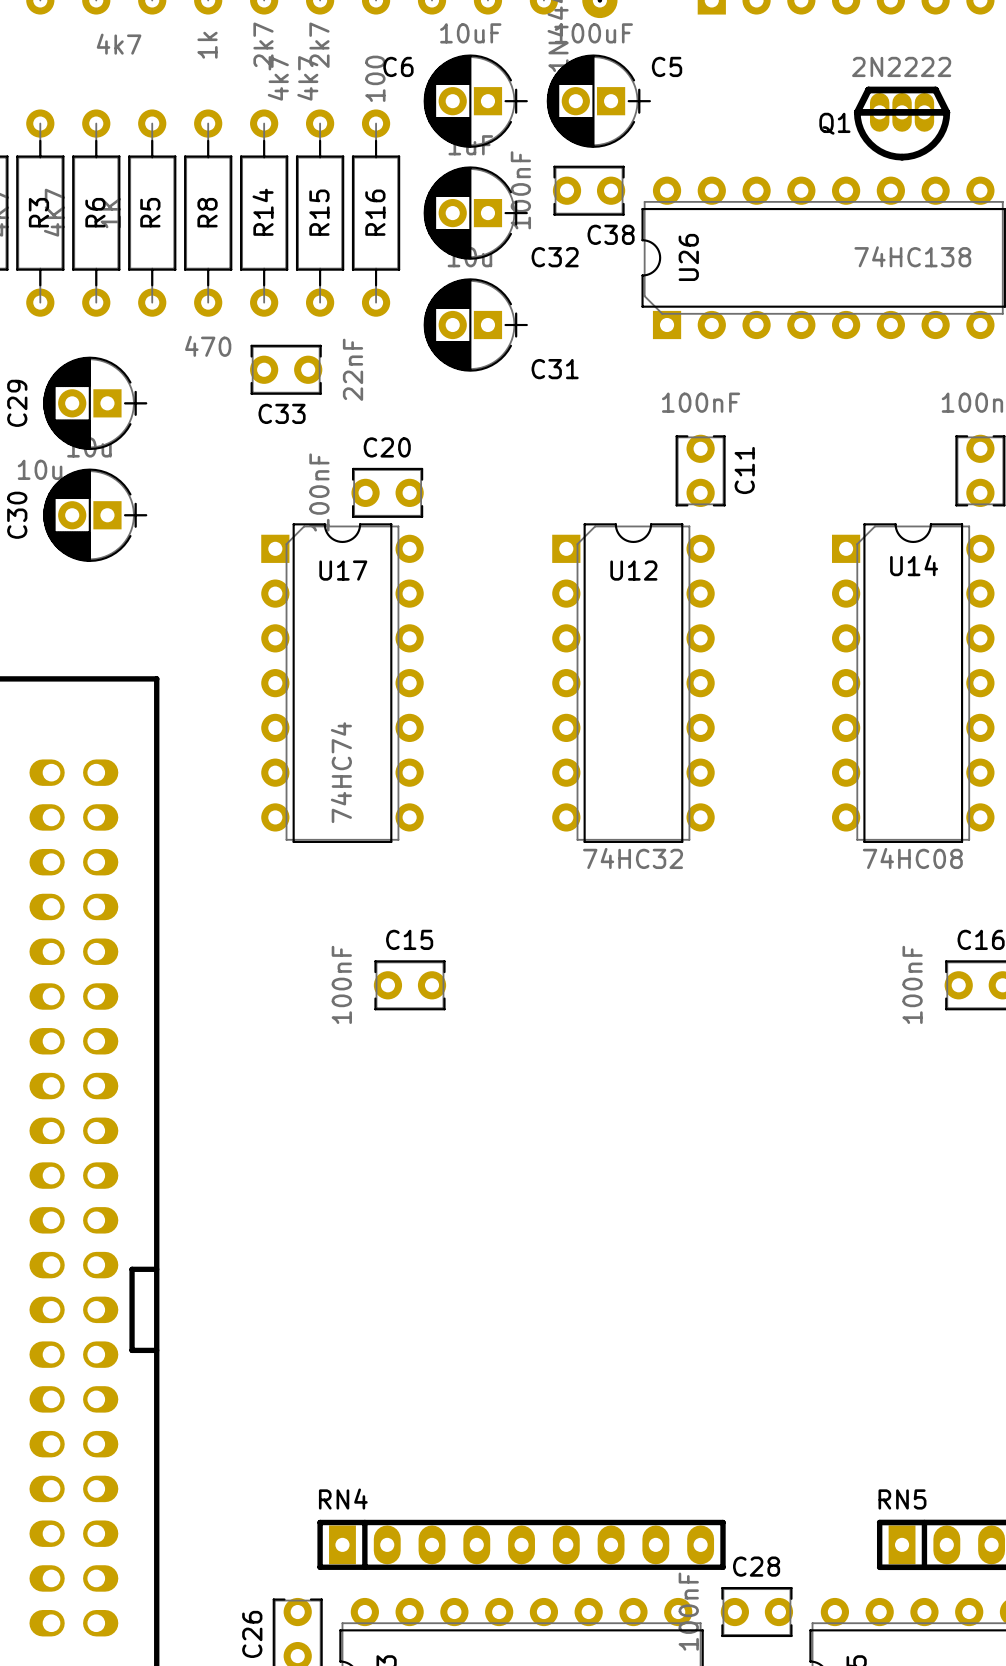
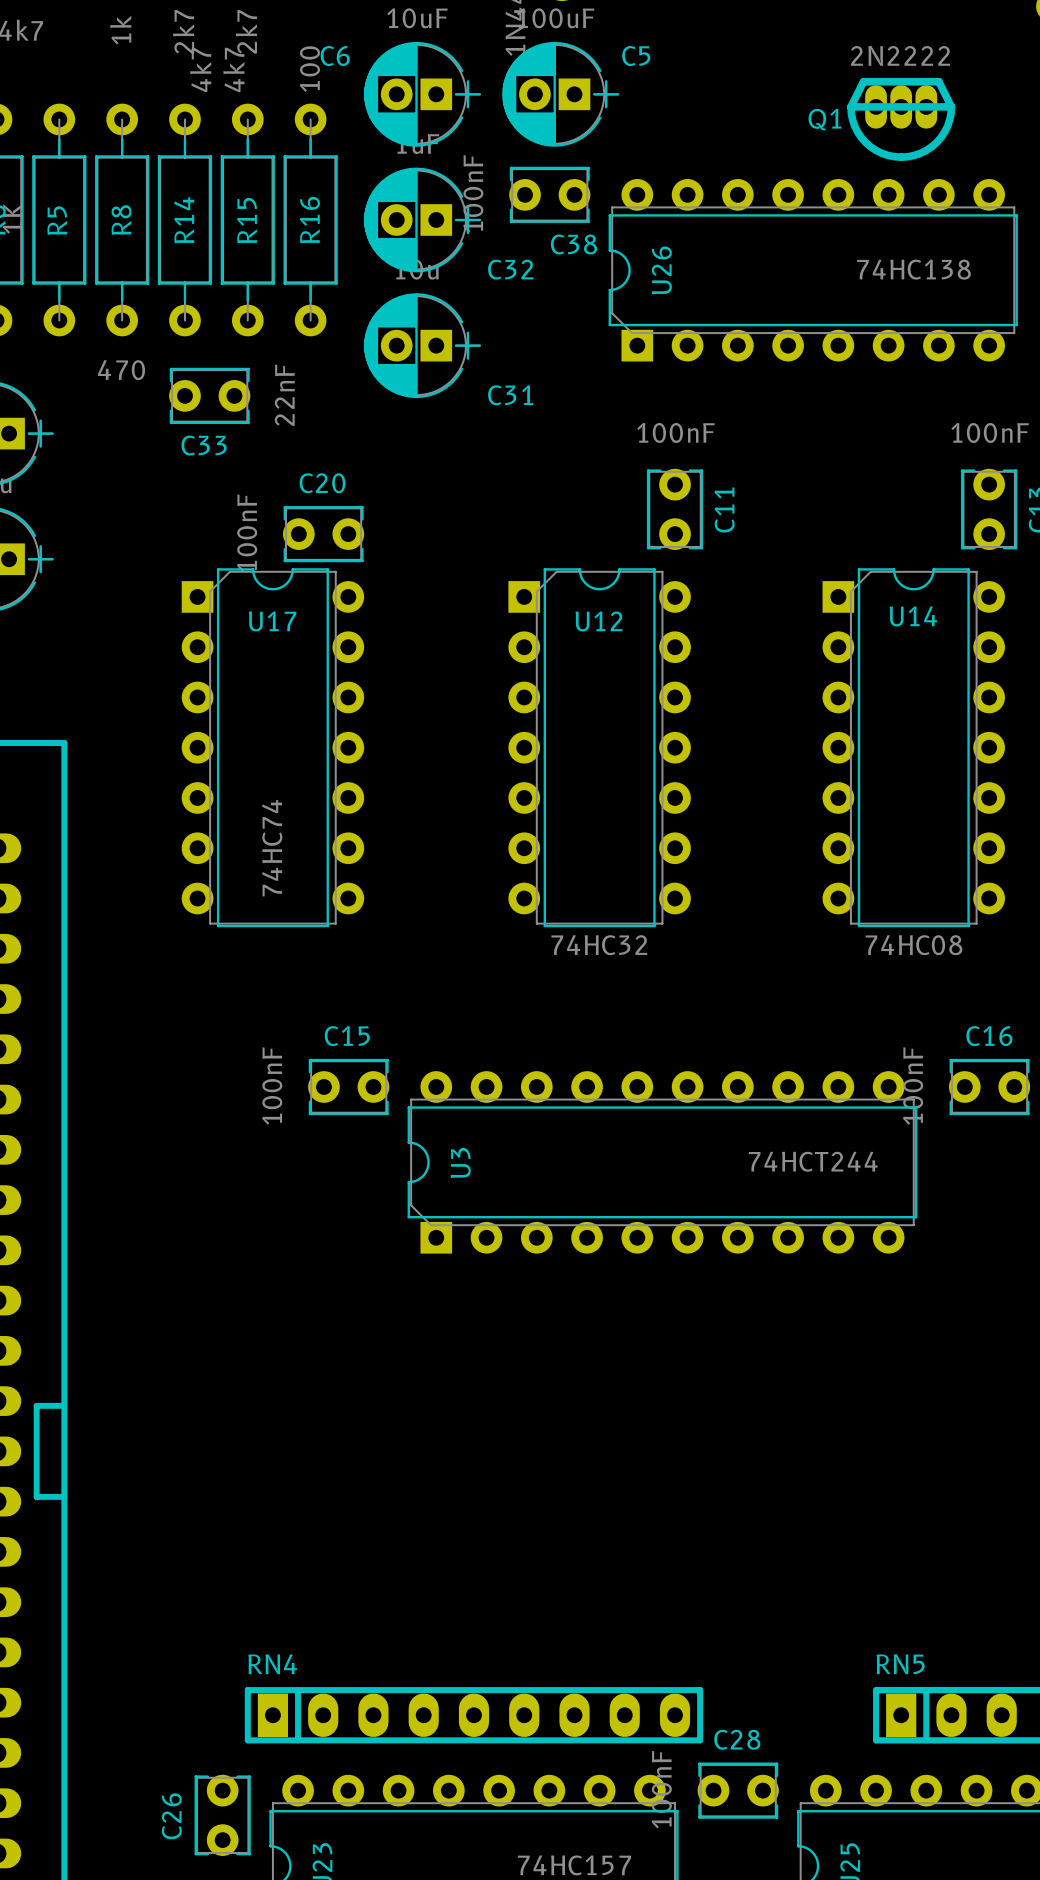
U3: none -> 74HCT244 (662, 1162)

